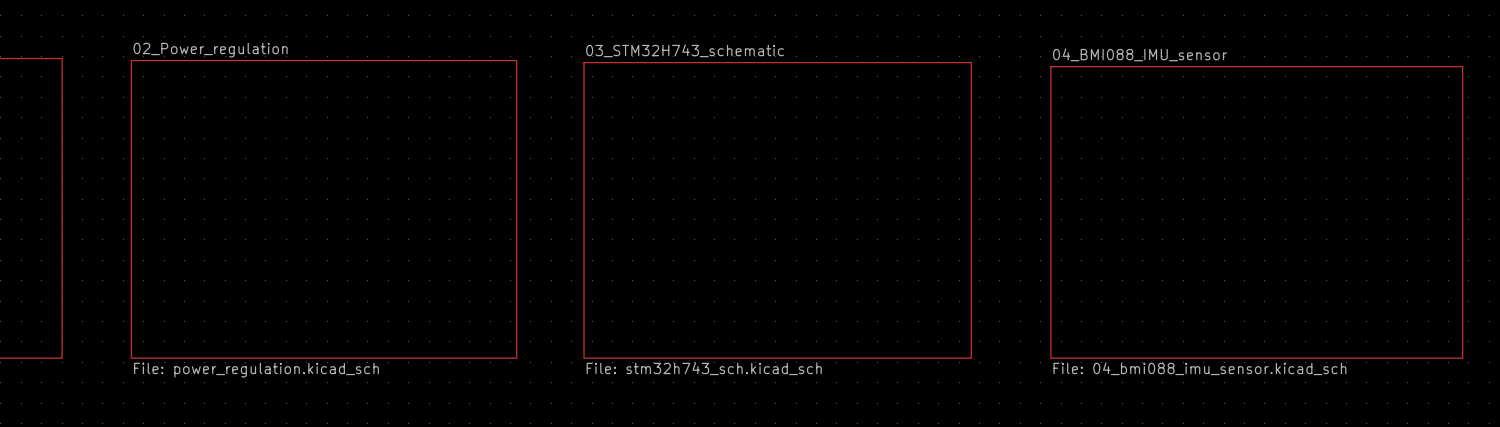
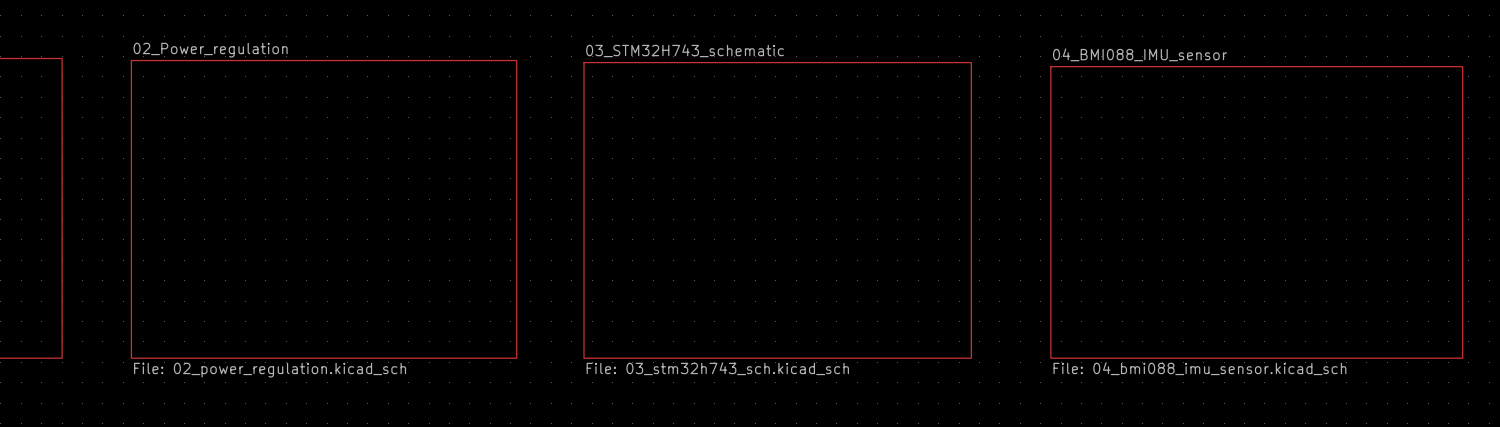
sheet 03_STM32H743_schematic value: File: stm32h743_sch.kicad_sch (704, 368) -> File: 03_stm32h743_sch.kicad_sch (717, 368)
sheet 02_Power_regulation value: File: power_regulation.kicad_sch (256, 370) -> File: 02_power_regulation.kicad_sch (270, 370)

